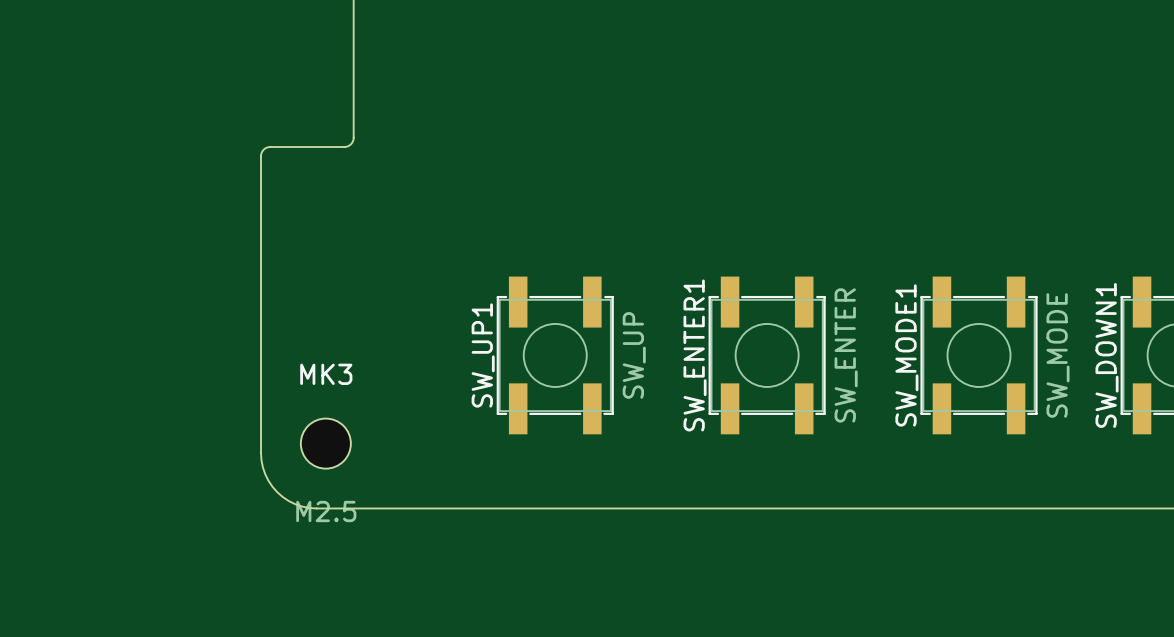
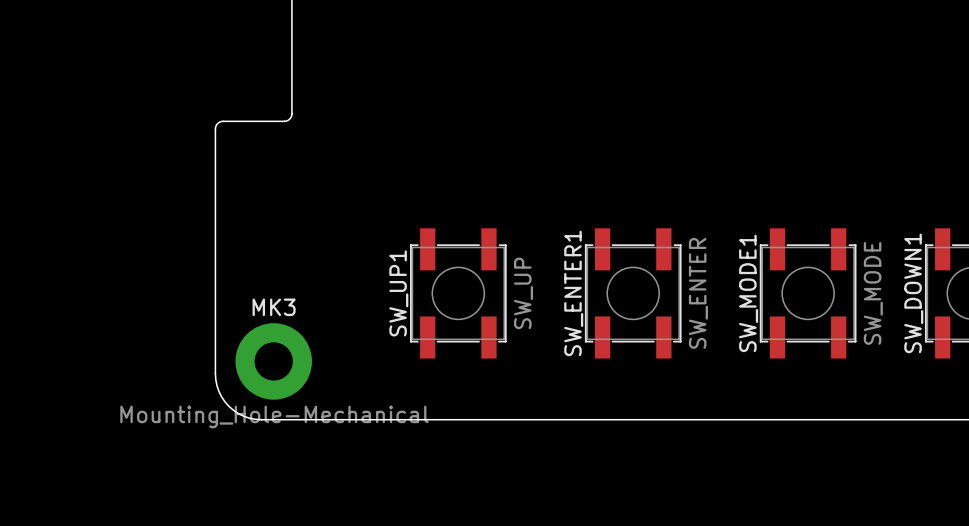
MK3 footprint: [300, 418, 351, 469] -> [235, 323, 312, 400]
MK3 value: M2.5 (326, 511) -> Mounting_Hole-Mechanical (274, 416)

